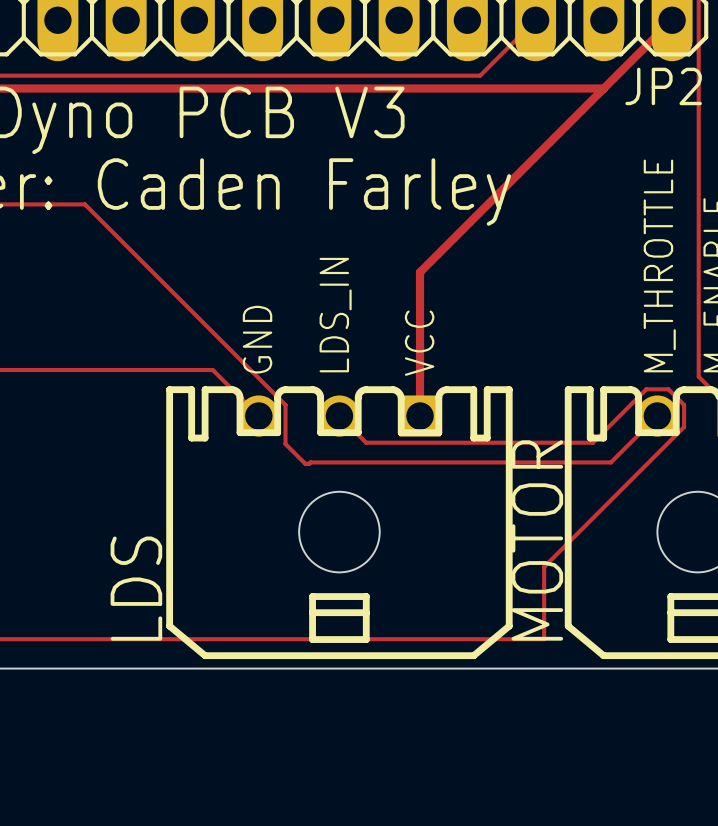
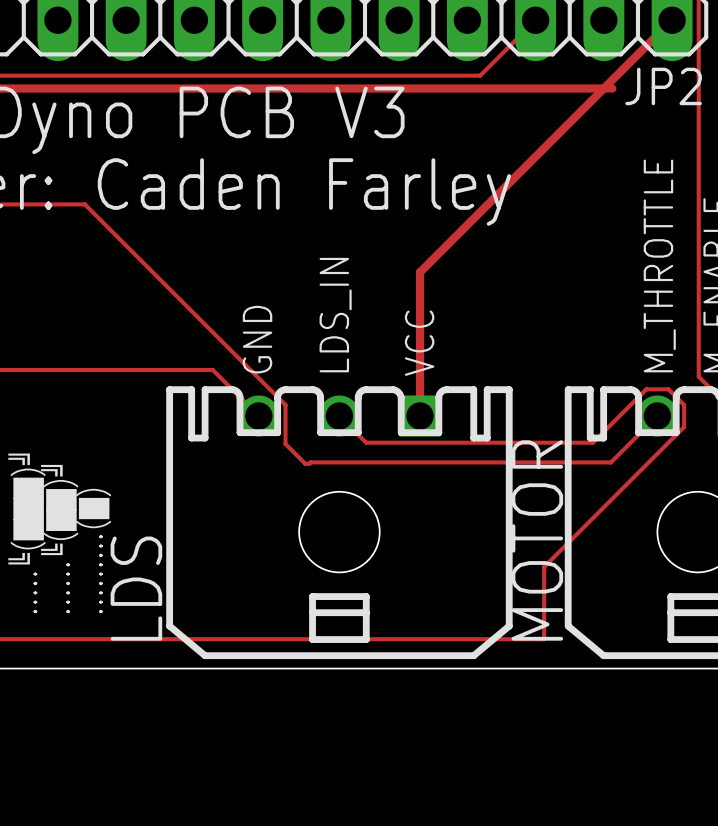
track: none -> (603, 88) (612, 88)
text: none -> …..╚(███)╝ (26, 533)
text: none -> ……╚(██)╝ (59, 538)
text: none -> ………(█) (93, 551)

